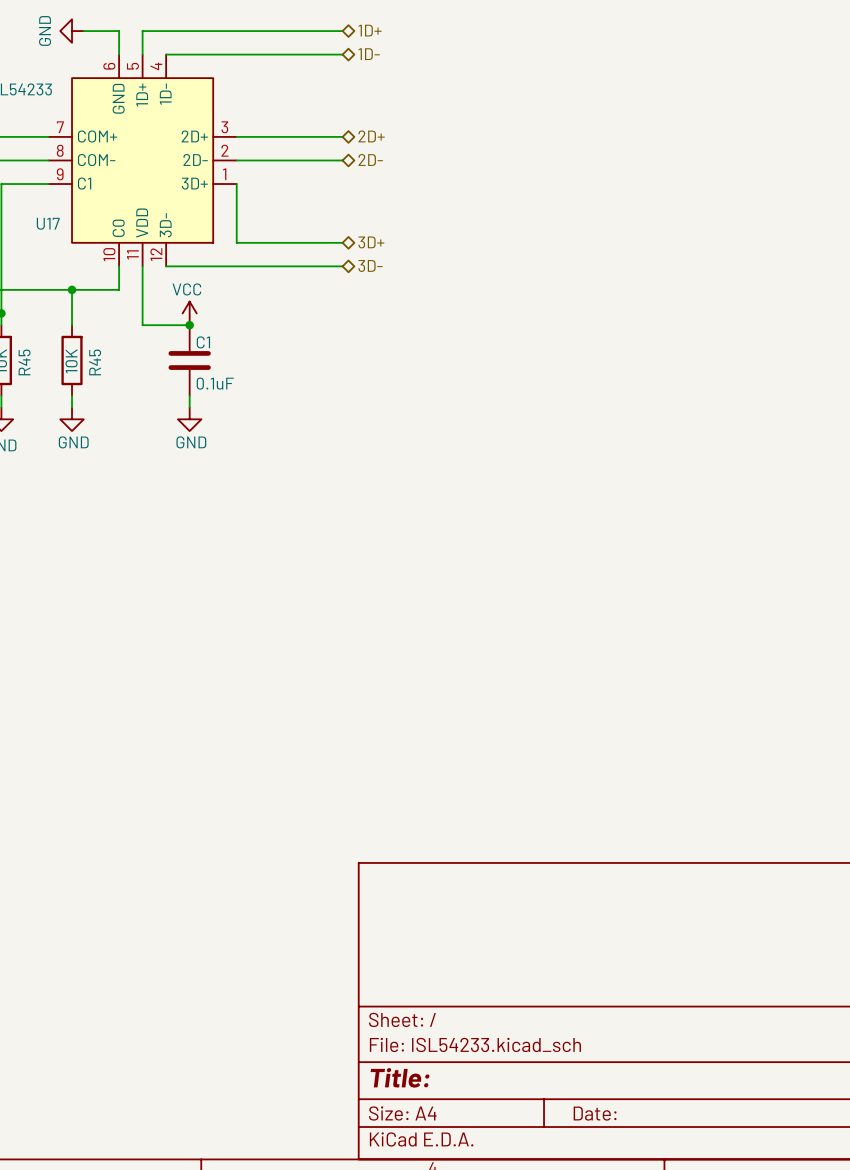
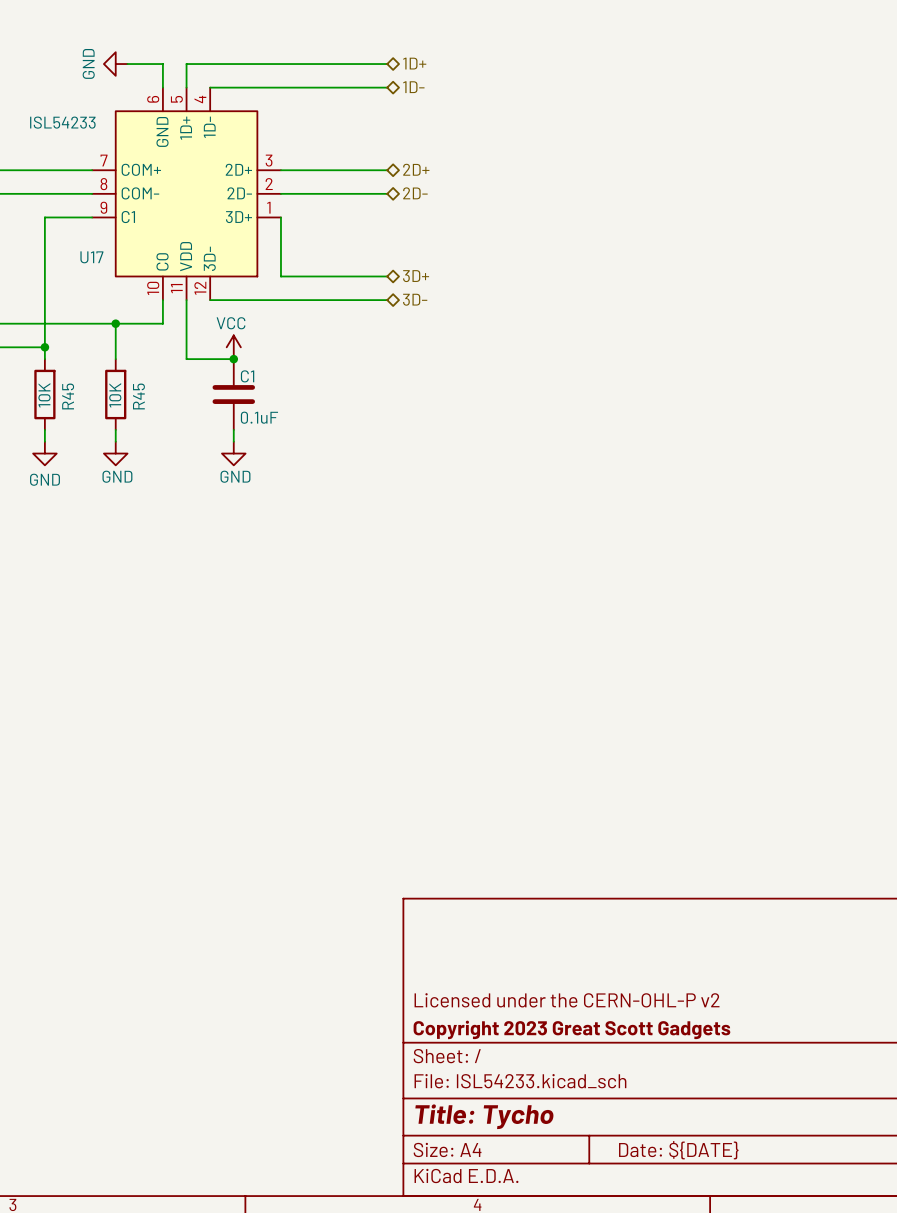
title block: none -> Licensed under the CERN-OHL-P v2 (567, 1000)
title block: none -> Copyright 2023 Great Scott Gadgets (571, 1029)
title block: Title: (400, 1077) -> Title: Tycho (484, 1116)
title block: Date: (595, 1113) -> Date: ${DATE} (678, 1150)

